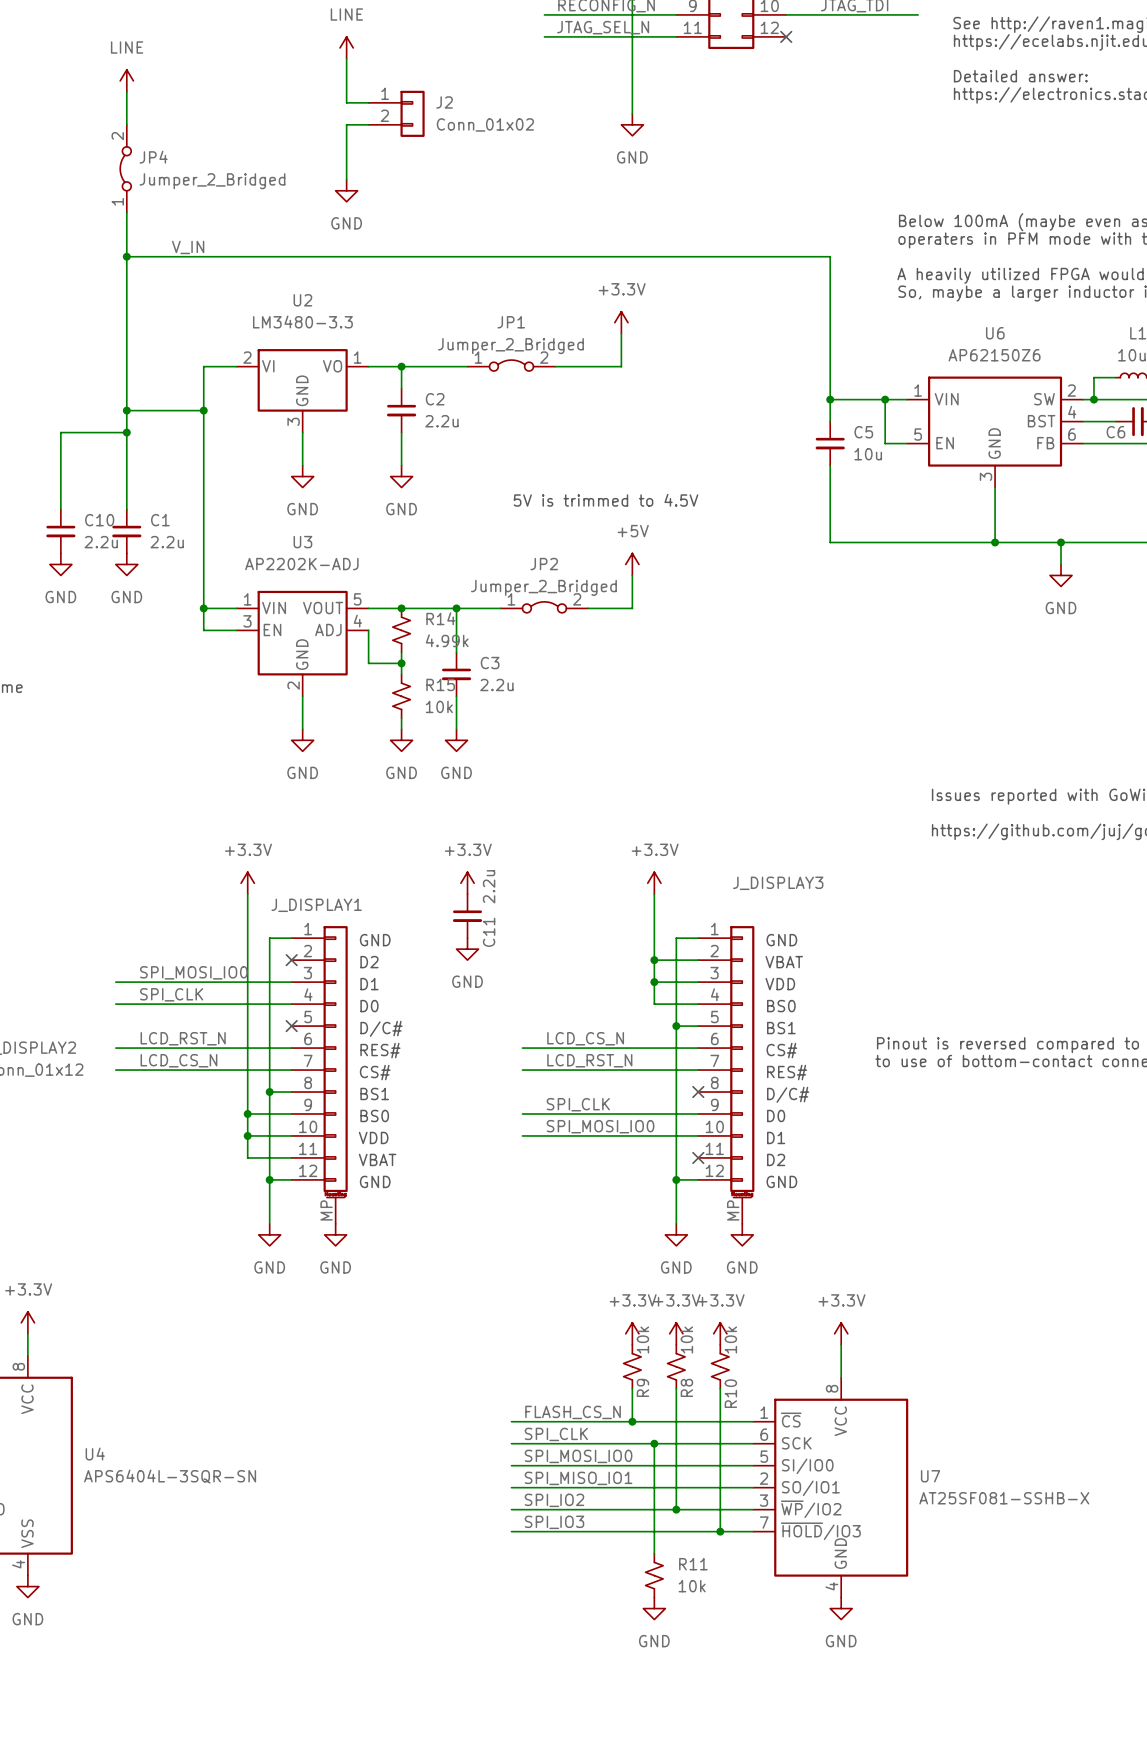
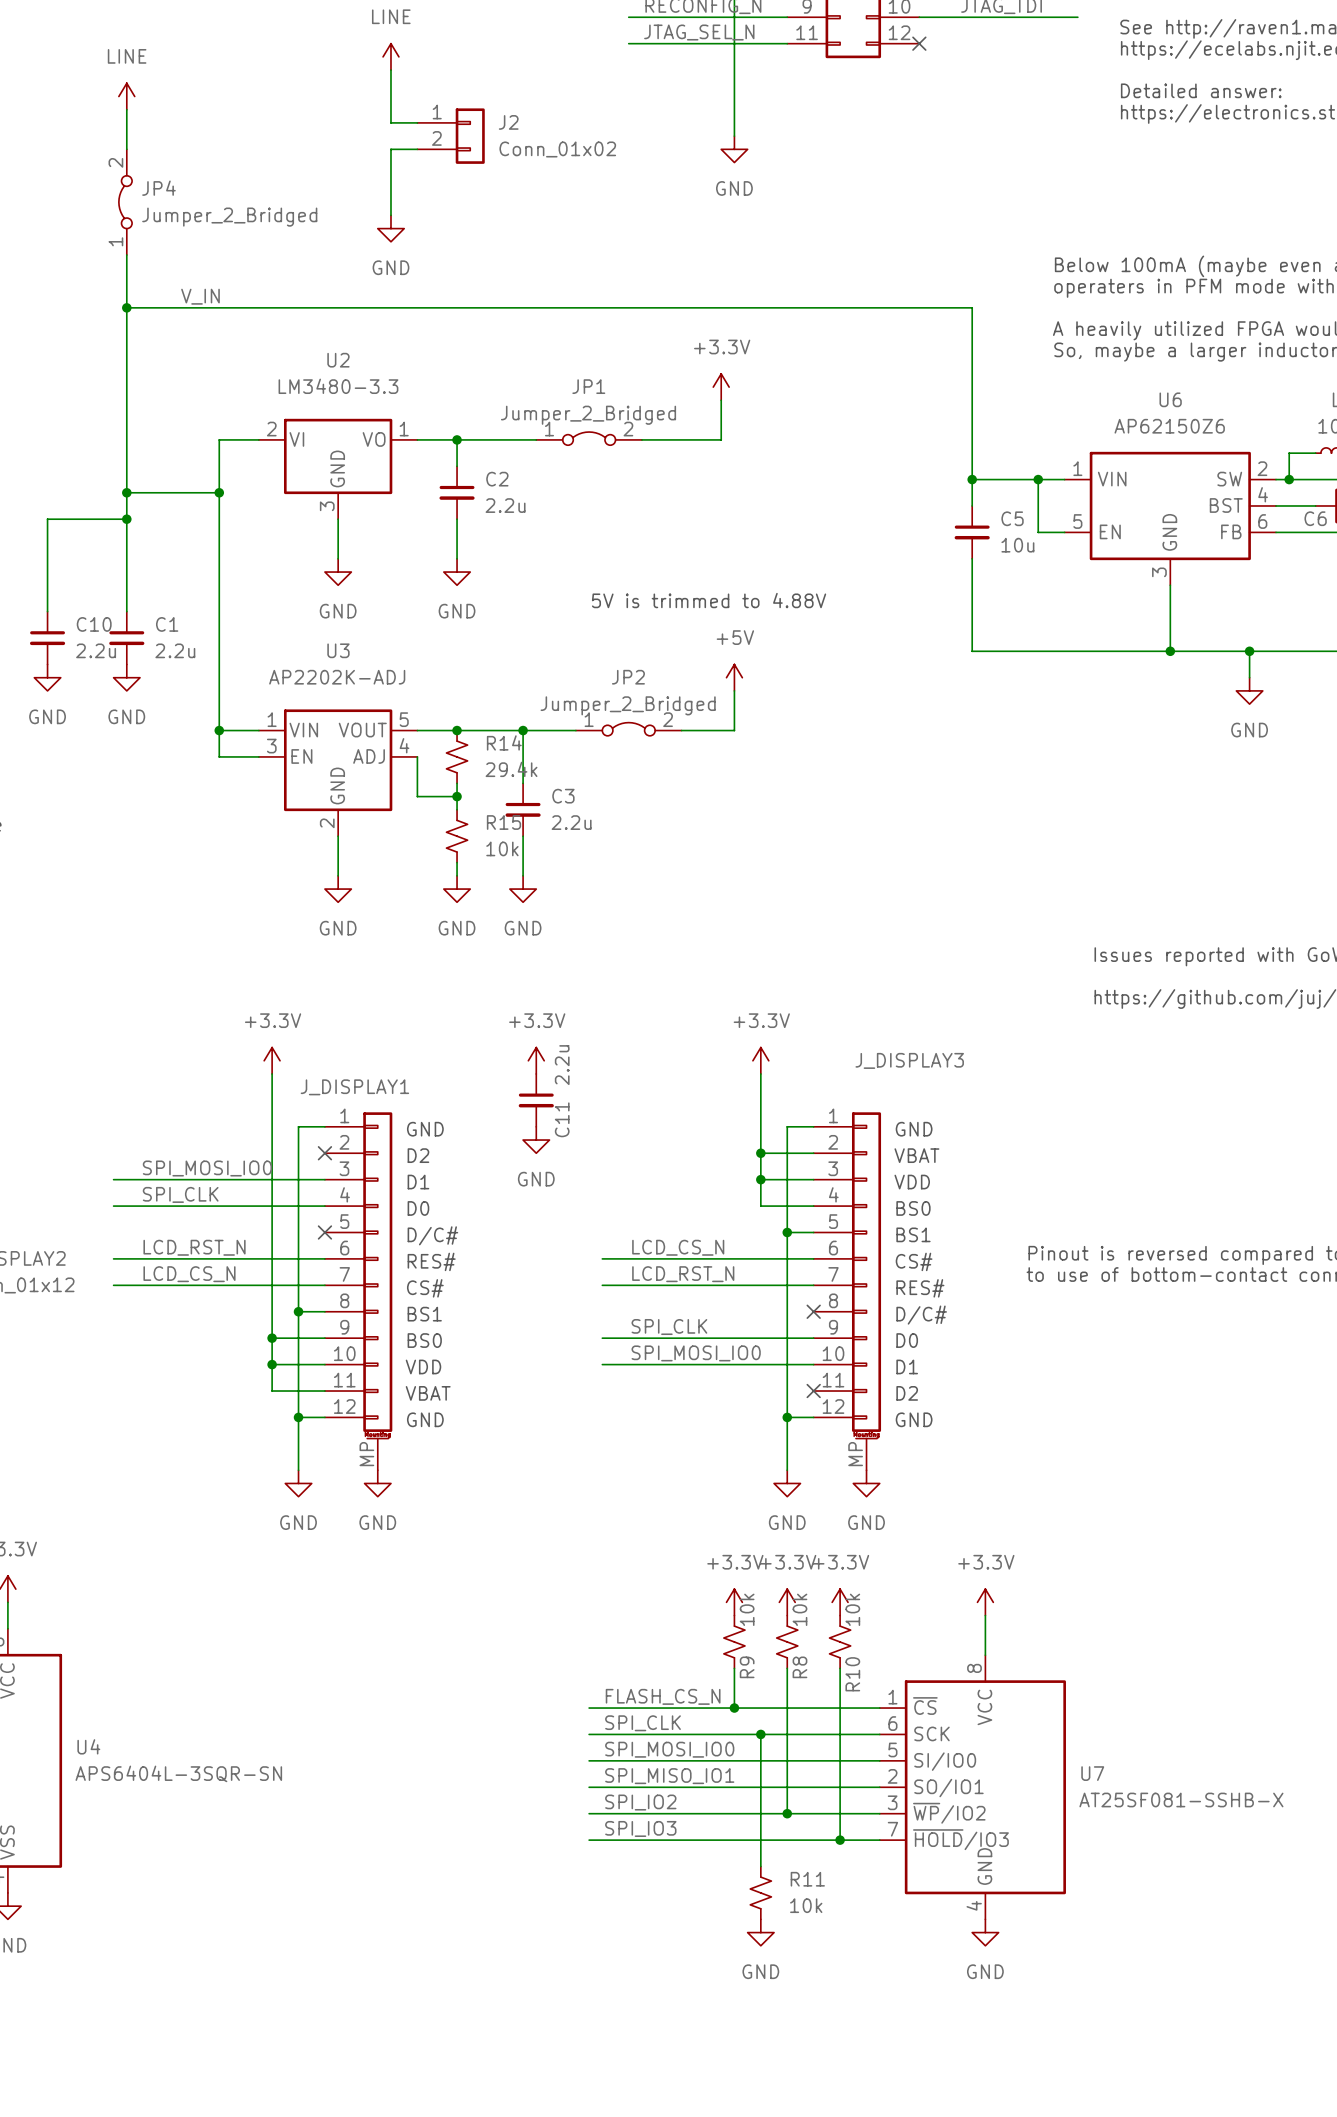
text: 5V is trimmed to 4.5V (606, 500) -> 5V is trimmed to 4.88V (709, 600)
R14 value: 4.99k (447, 640) -> 29.4k (511, 769)

